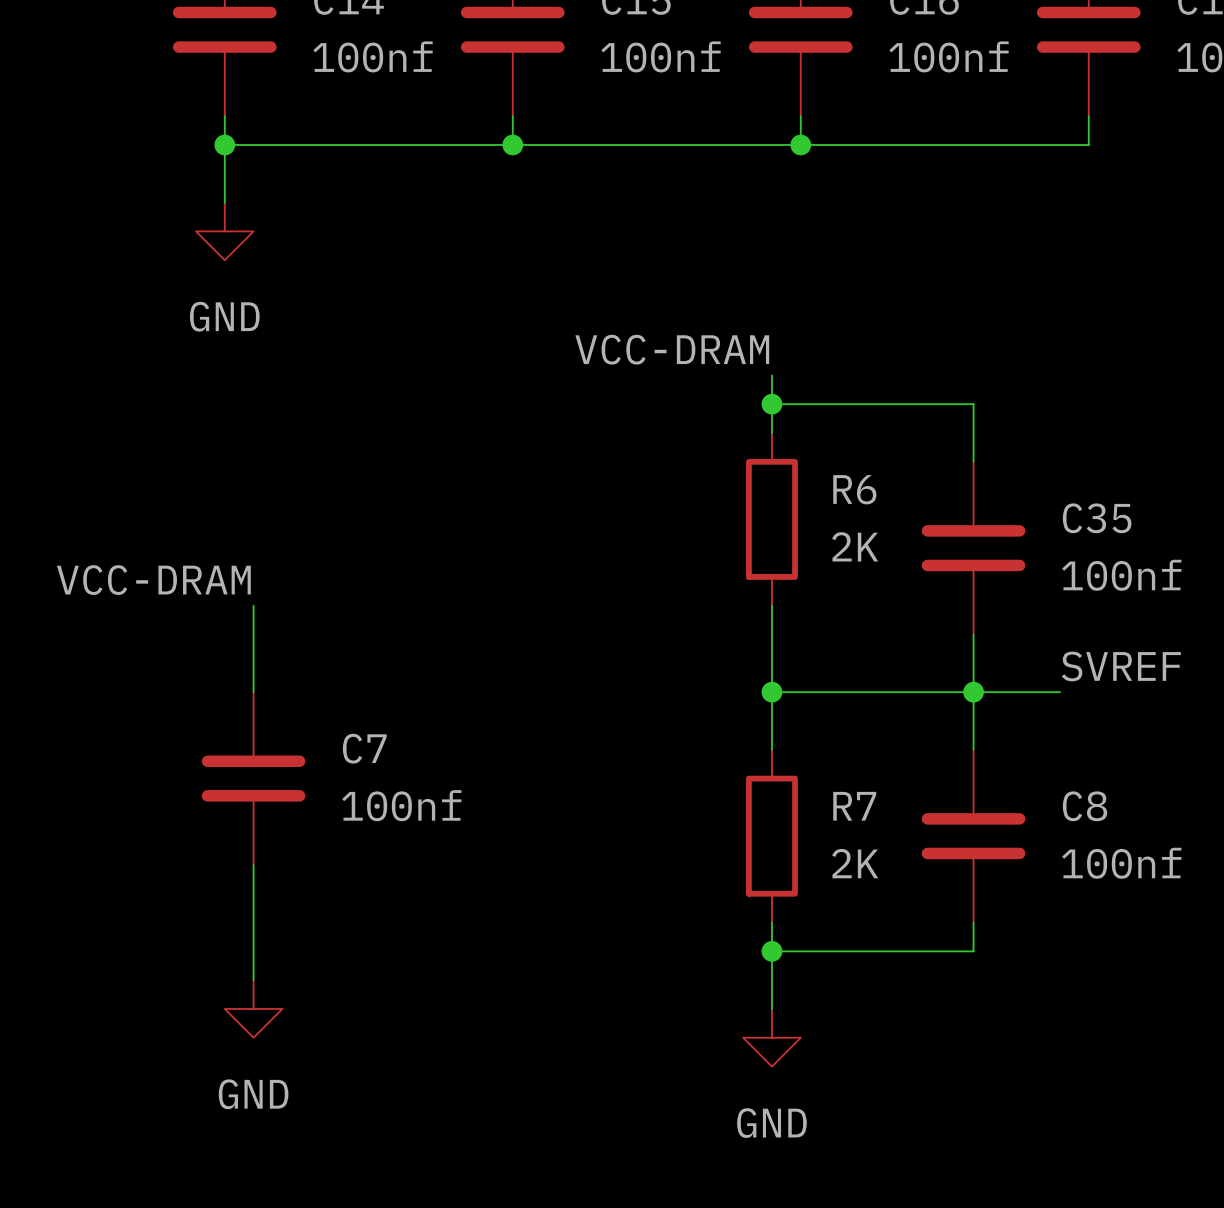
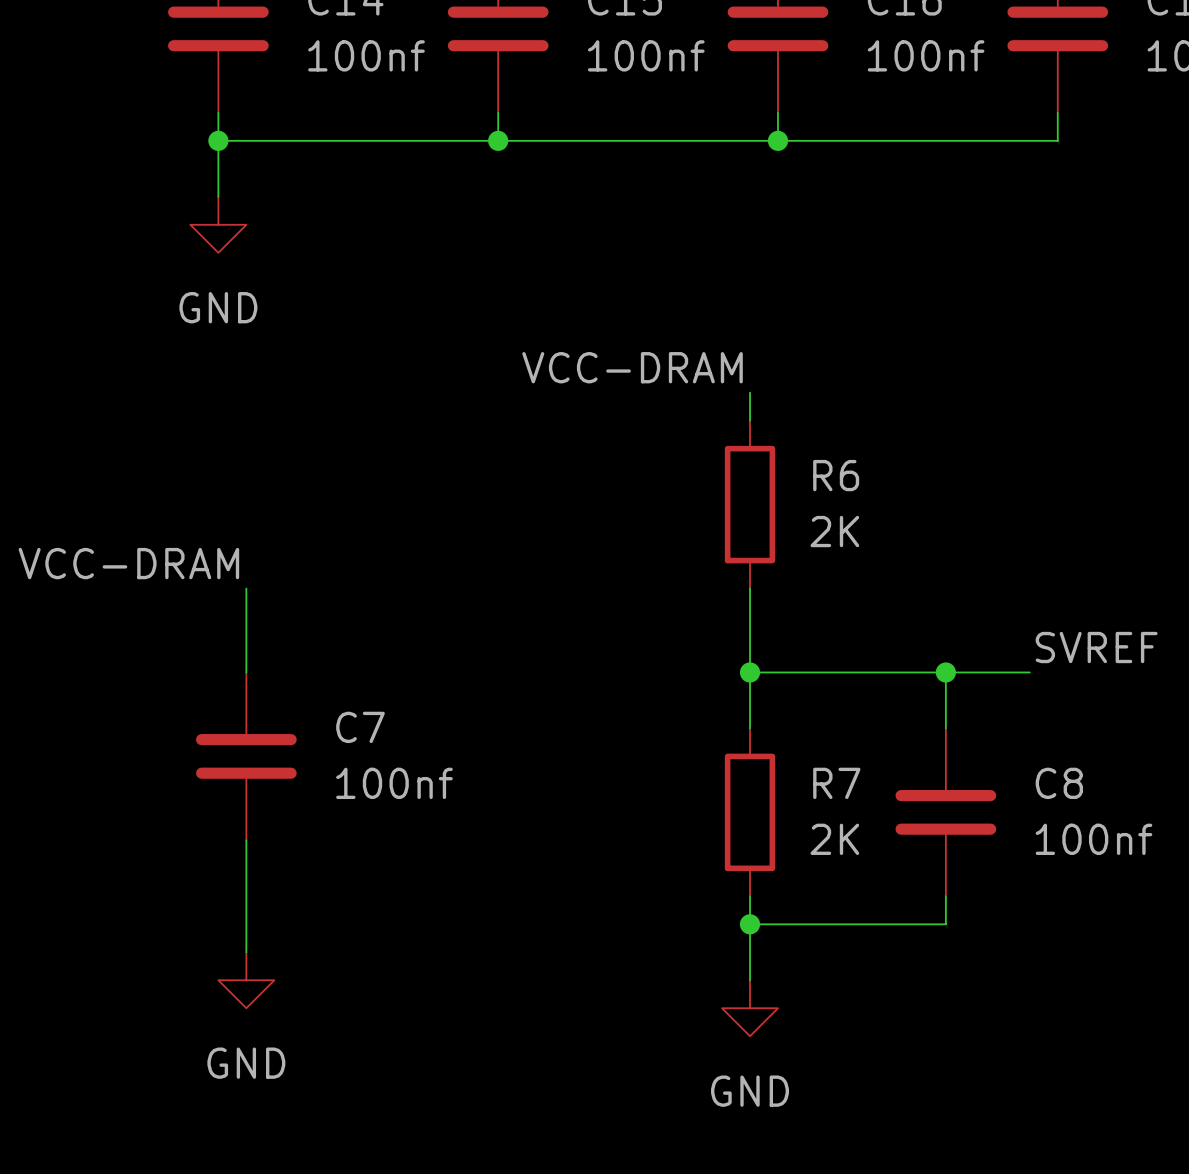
label position: VCC-DRAM (672, 349) -> VCC-DRAM (632, 367)
wire: (771, 375) (771, 404) (973, 404) (973, 461) -> none
junction: (771, 404) -> none
C35: 100nf (973, 548) -> none
wire: (973, 634) (973, 692) -> none

